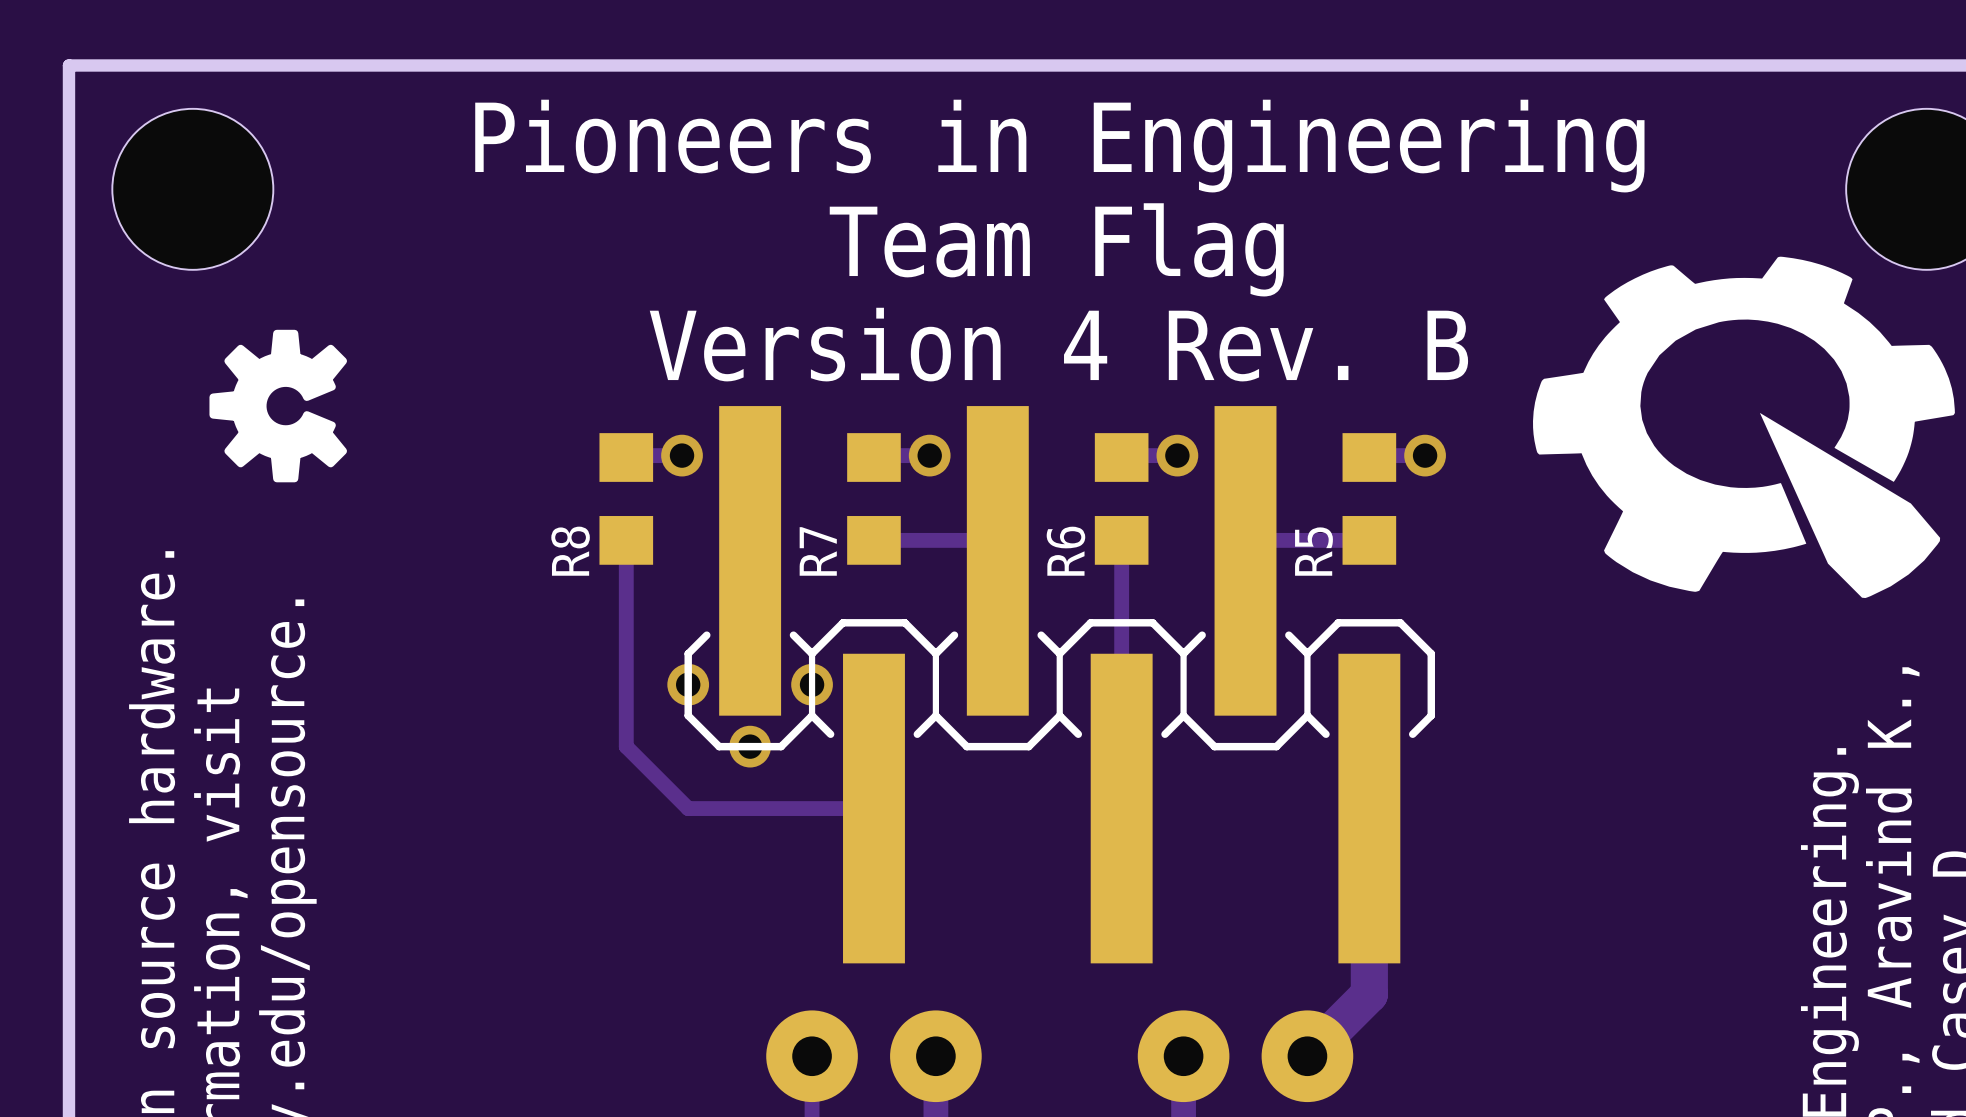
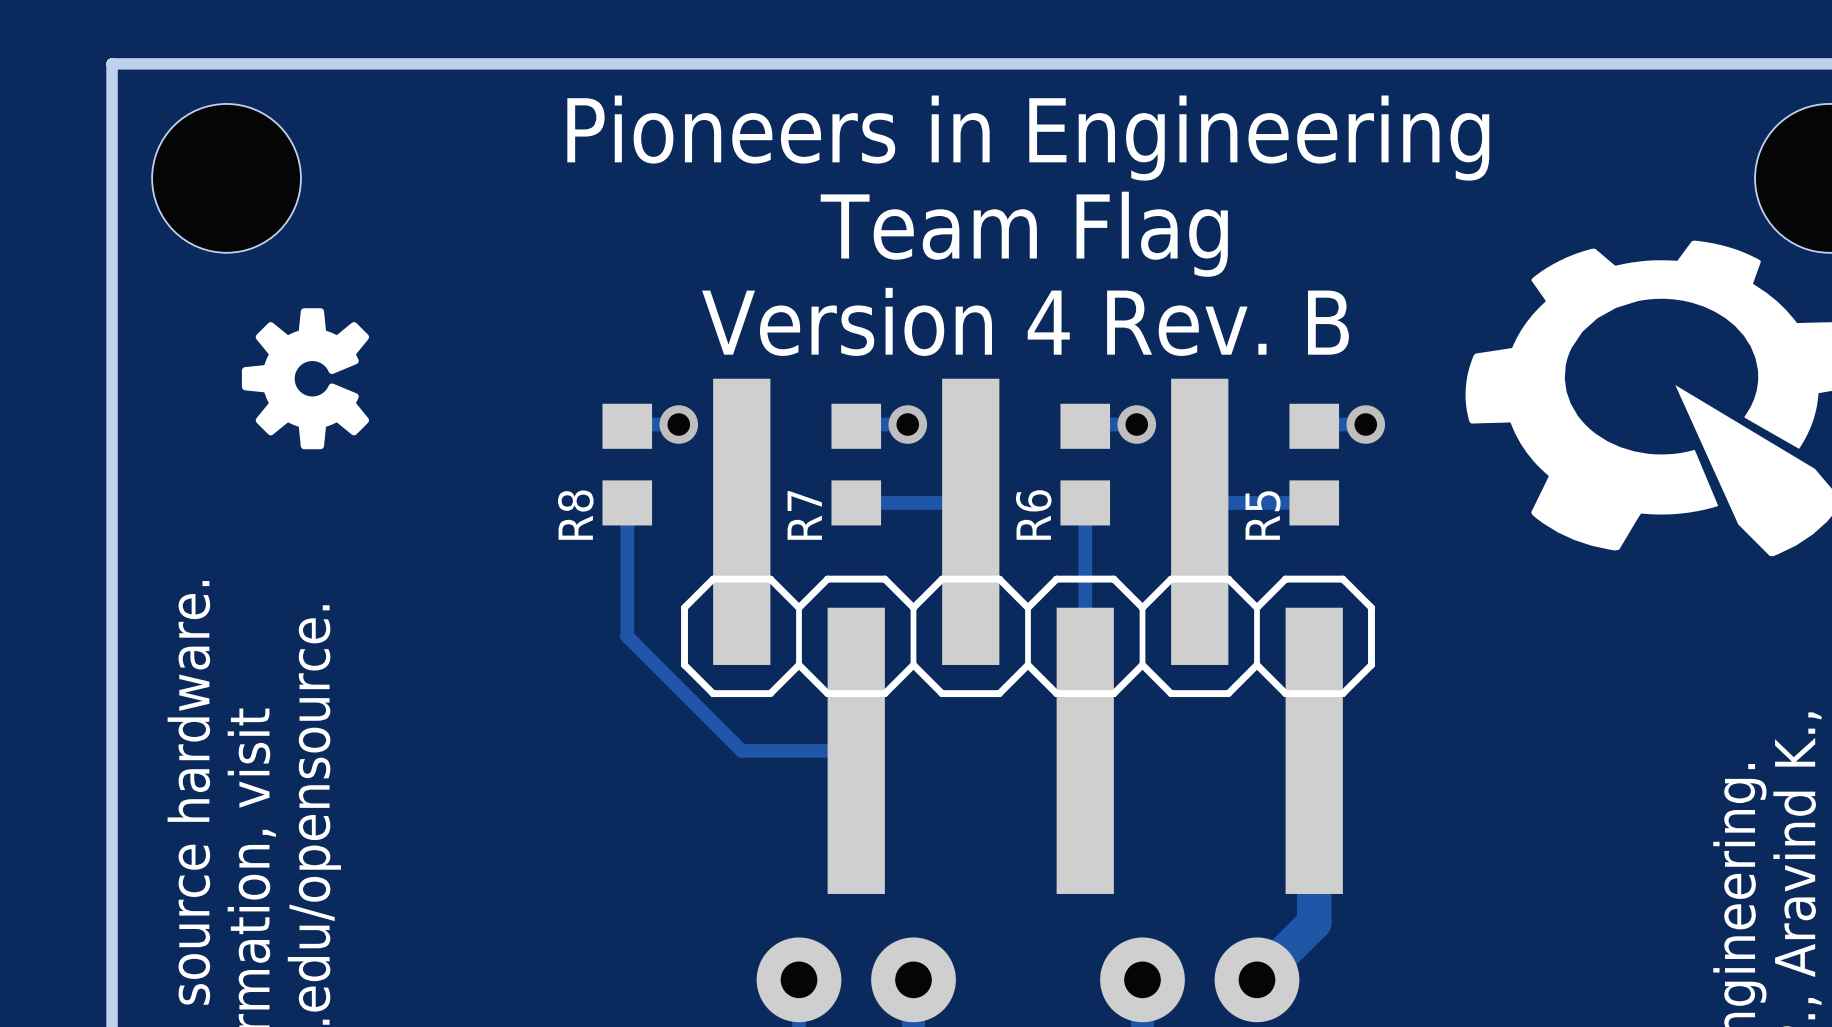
part footprint: [684, 406, 1435, 964] -> [681, 378, 1375, 894]
track: (626, 684) (626, 746) (688, 808) (750, 808) -> (627, 636) (741, 750)
via: (688, 684) -> none
via: (812, 684) -> none
via: (750, 746) -> none

